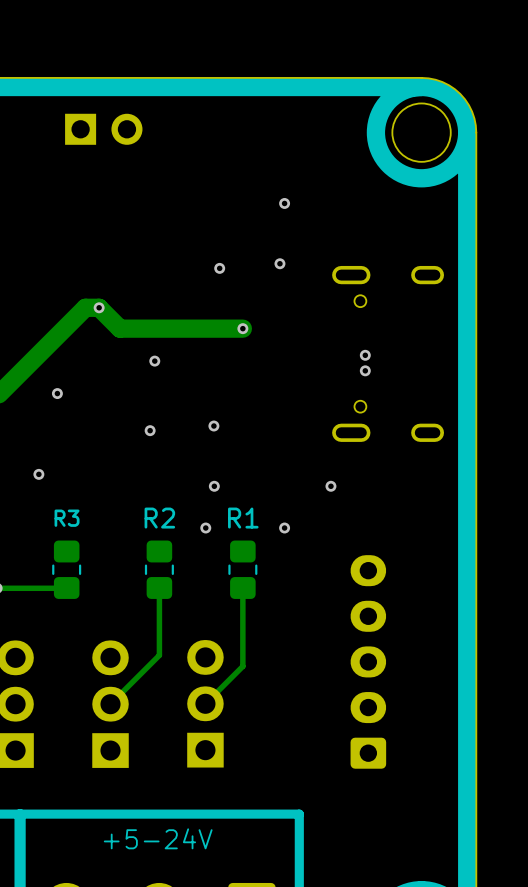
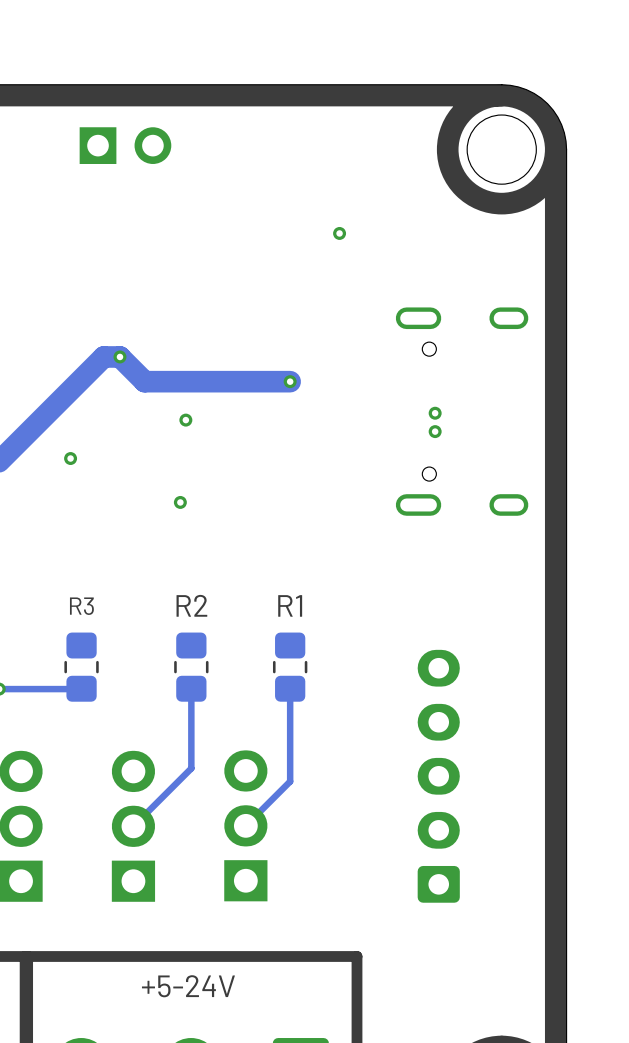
via: (279, 263) -> none
via: (219, 268) -> none
via: (213, 426) -> none
via: (38, 474) -> none
via: (214, 486) -> none
via: (330, 486) -> none
via: (205, 528) -> none
via: (284, 528) -> none

